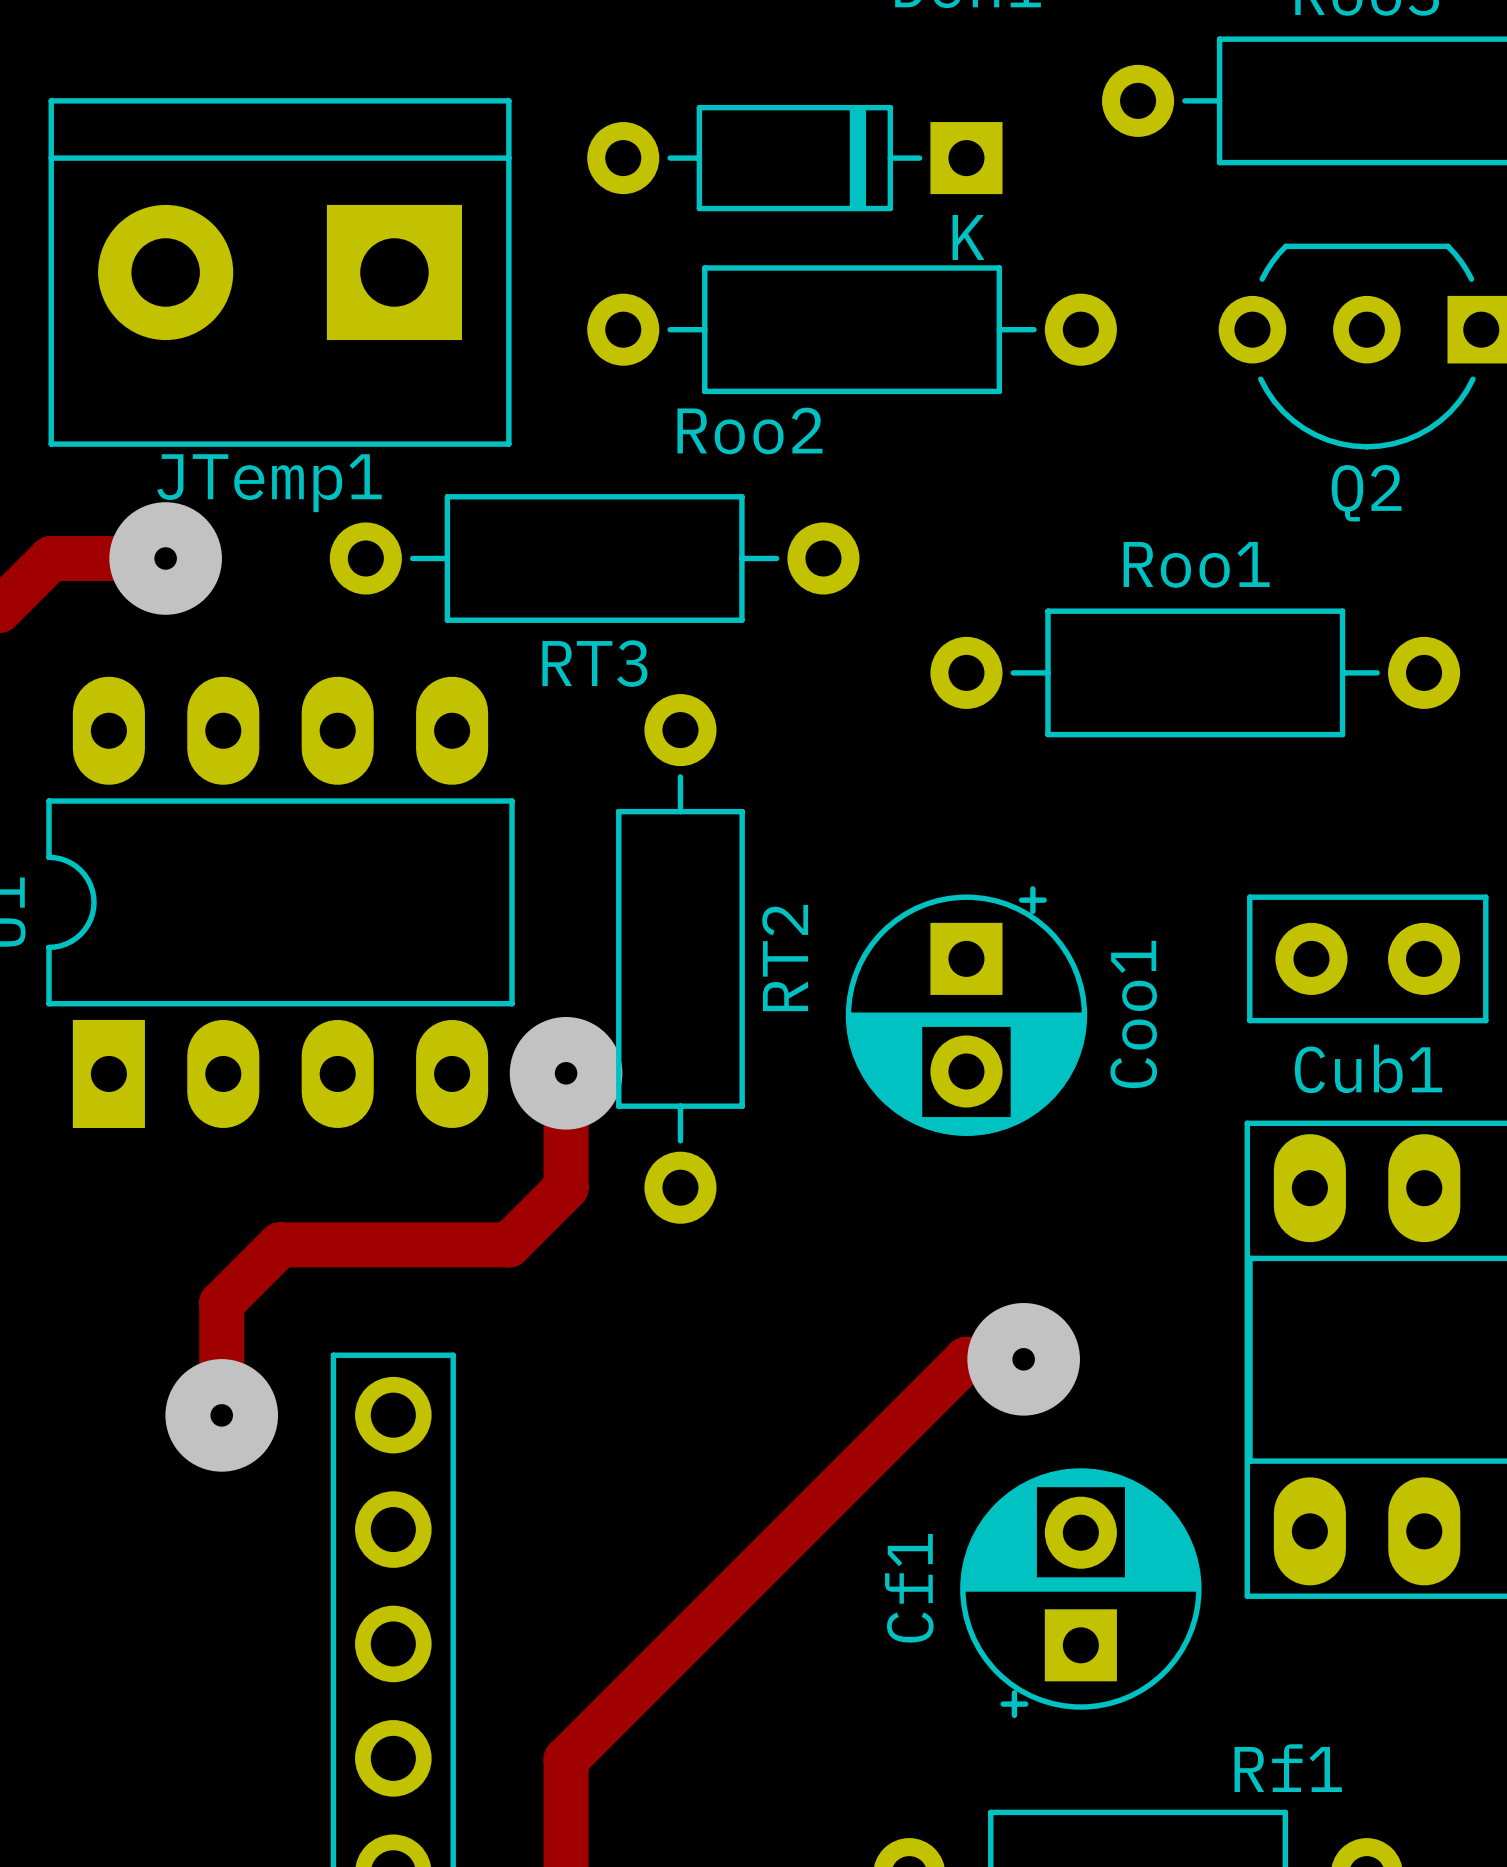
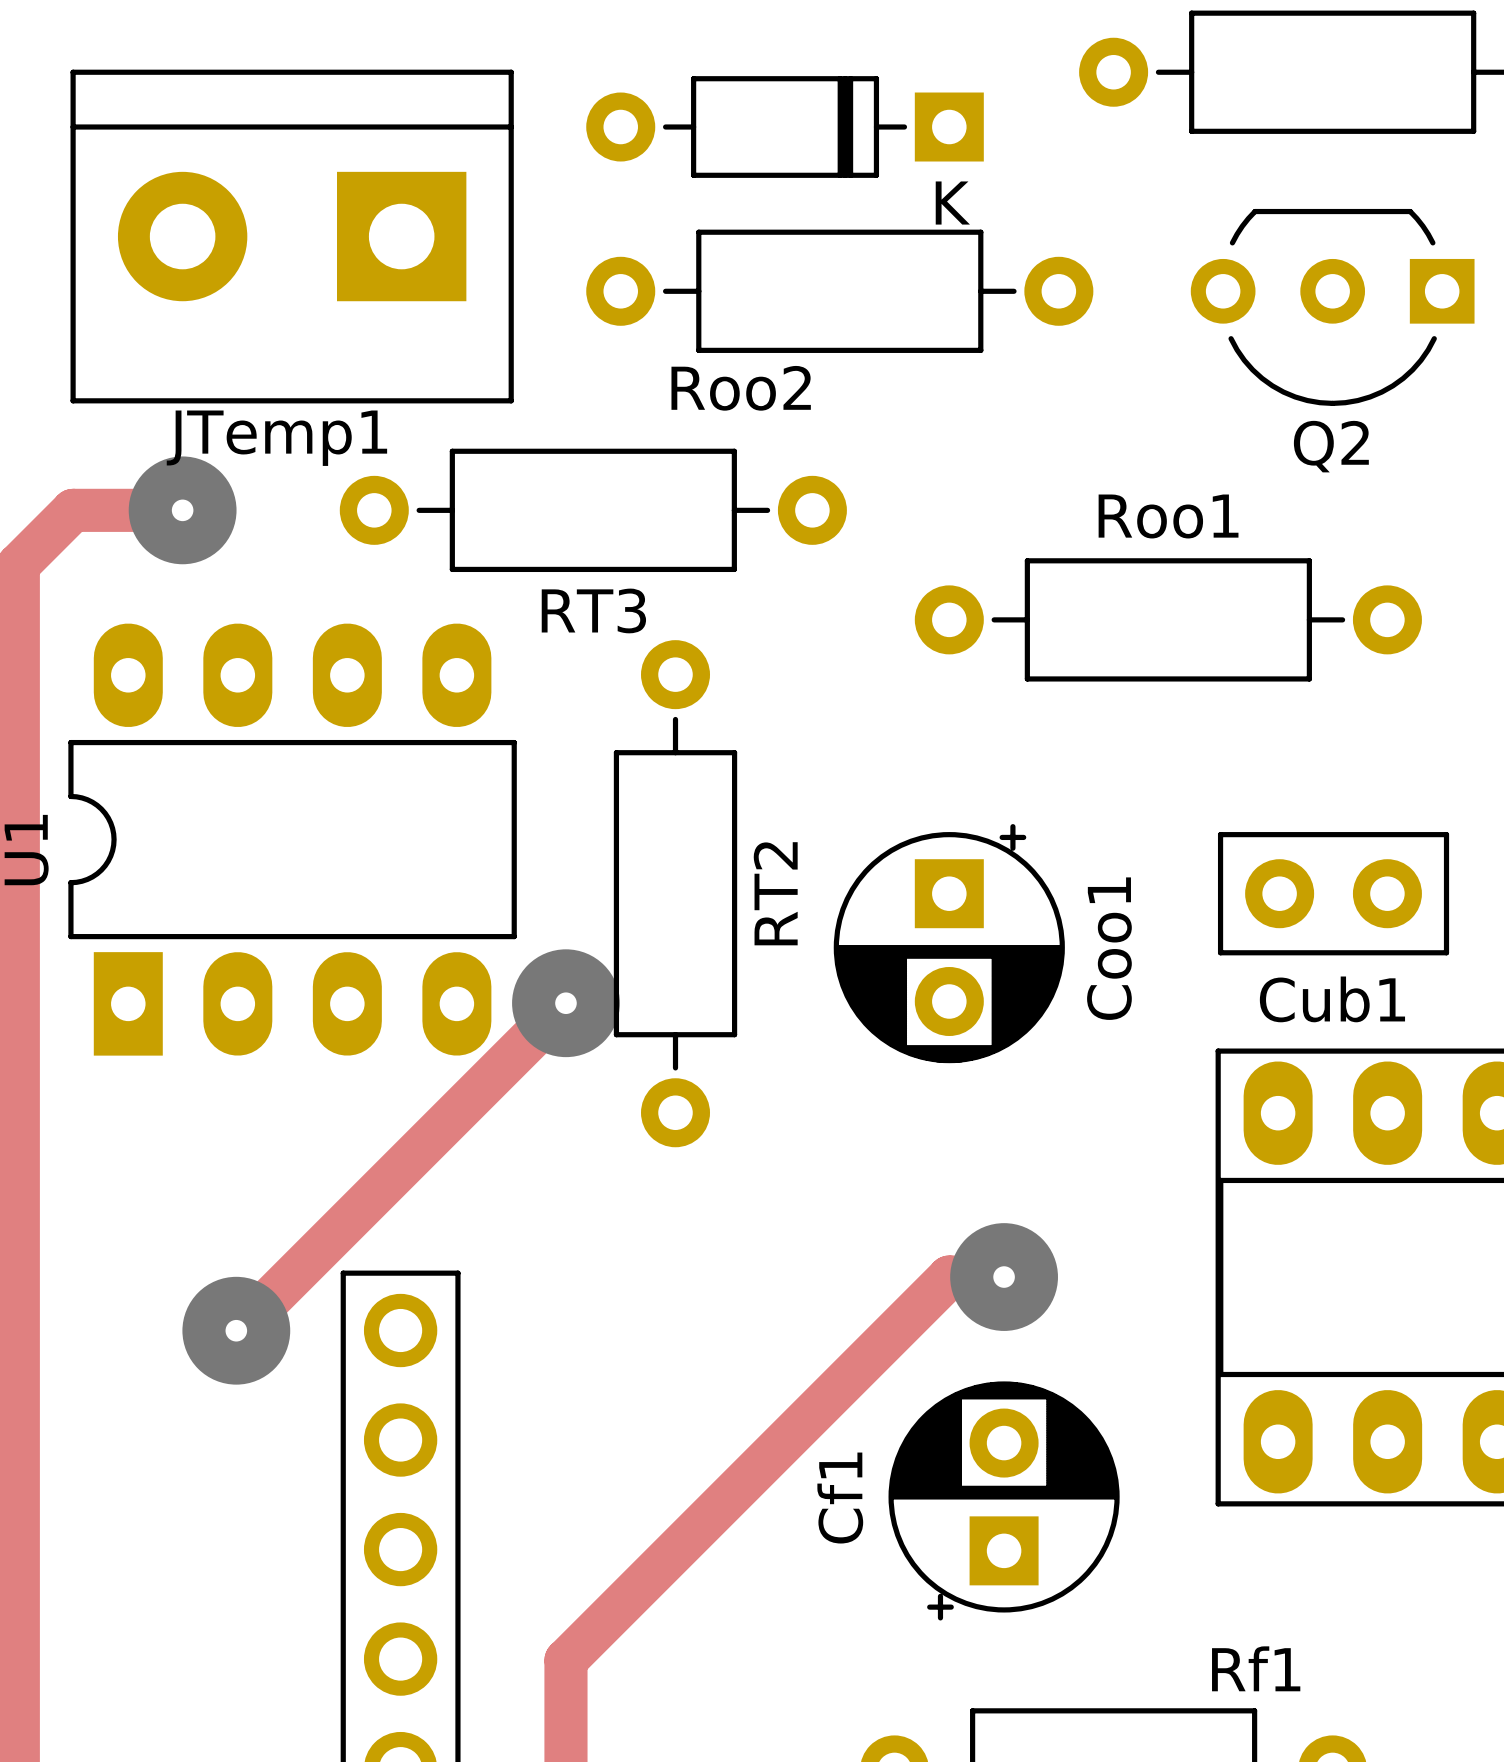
track: (566, 1073) (566, 1187) (508, 1244) (280, 1244) (221, 1303) (221, 1415) -> (565, 1003) (238, 1330) (236, 1330)
Cf1 position: (1080, 1593) -> (1004, 1500)

